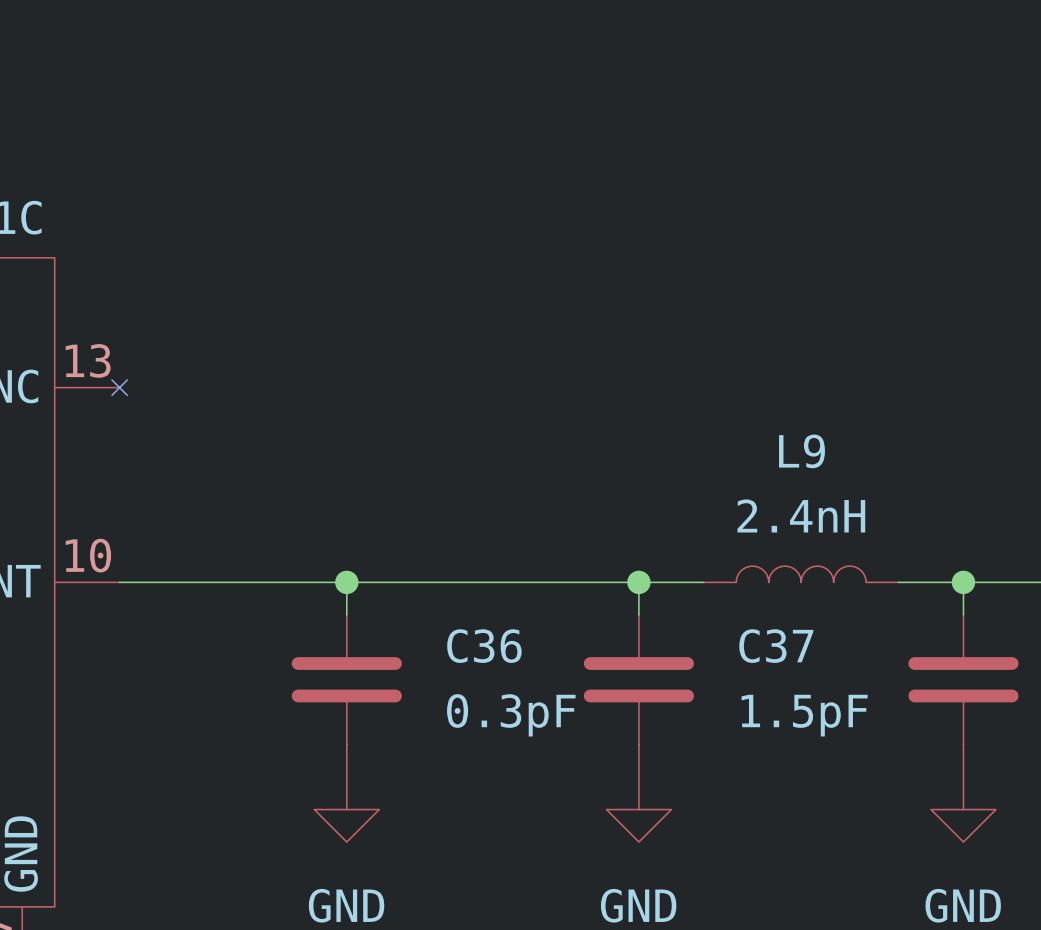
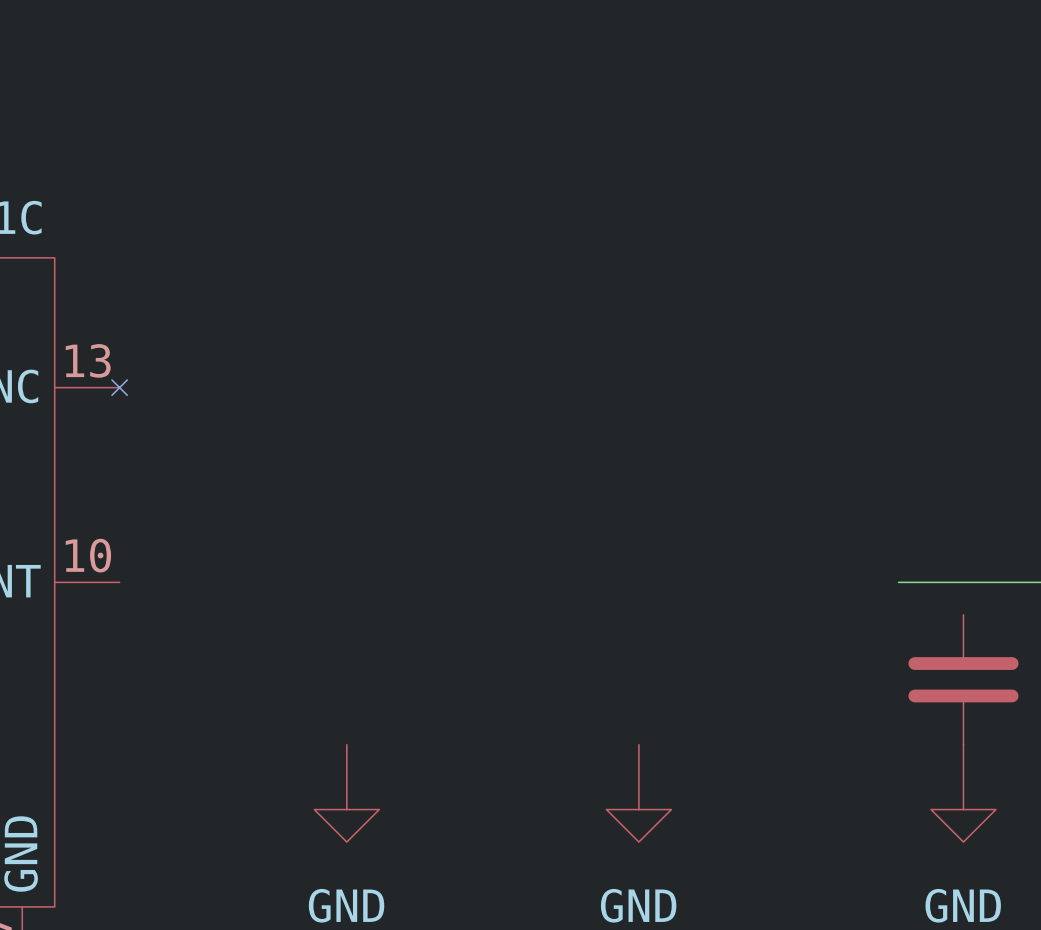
L9: 2.4nH (801, 574) -> none
wire: (119, 582) (703, 582) -> none
wire: (346, 582) (346, 614) -> none
junction: (346, 582) -> none
wire: (638, 582) (638, 614) -> none
junction: (638, 582) -> none
wire: (963, 582) (963, 614) -> none
junction: (963, 582) -> none
C36: 0.3pF (346, 679) -> none
C37: 1.5pF (638, 679) -> none

